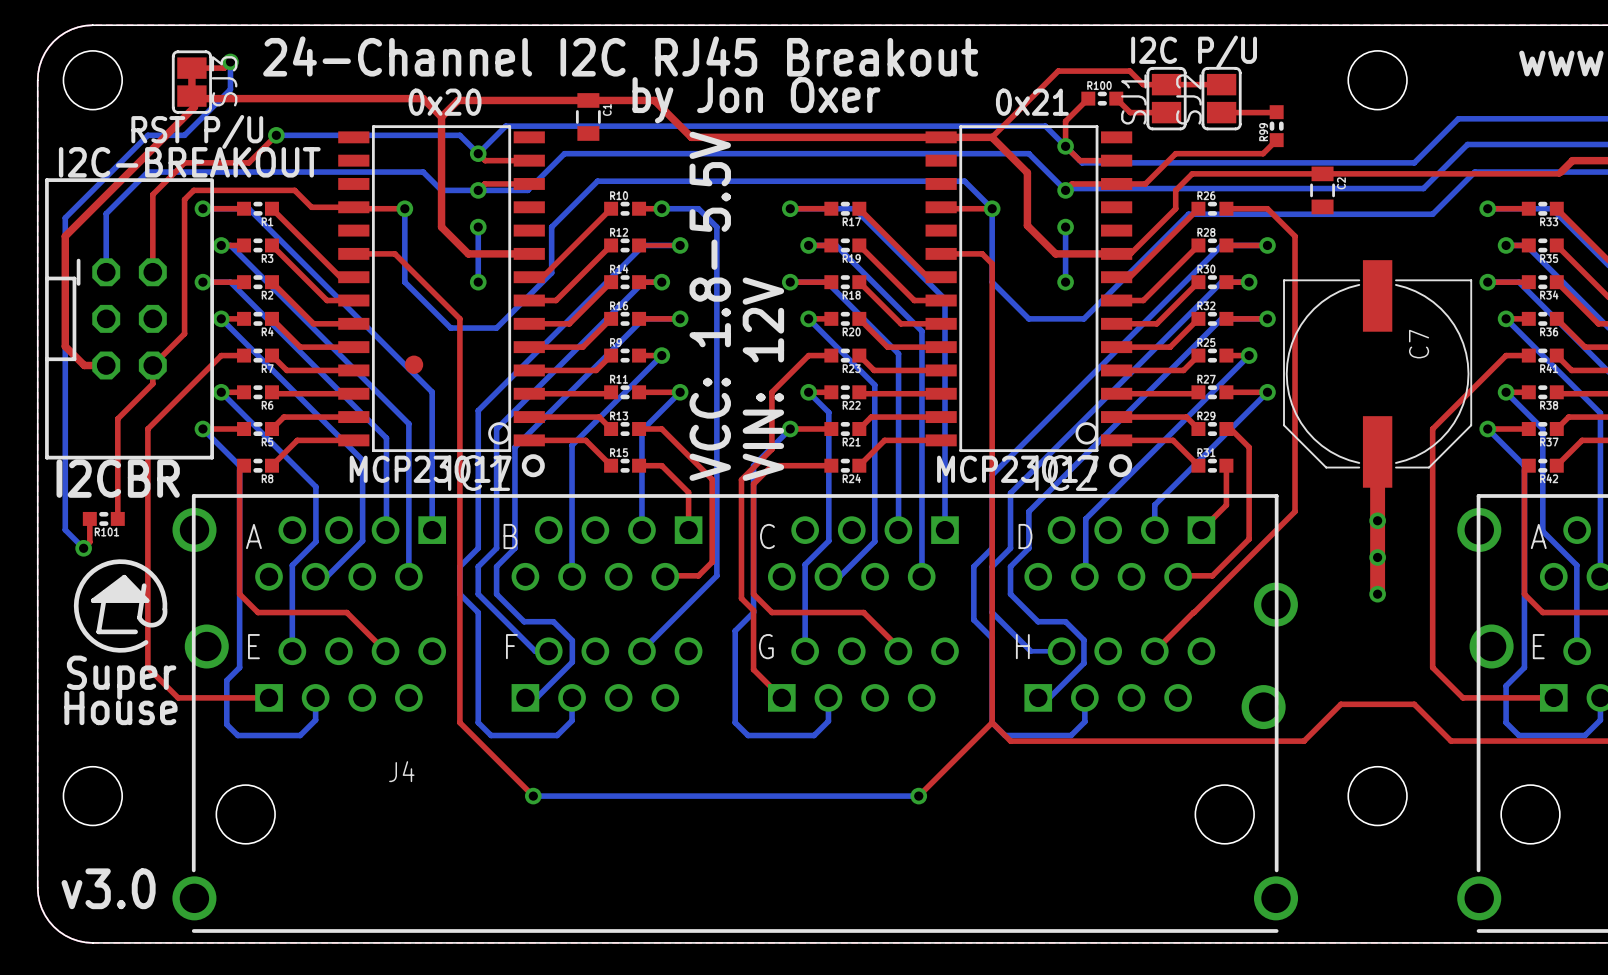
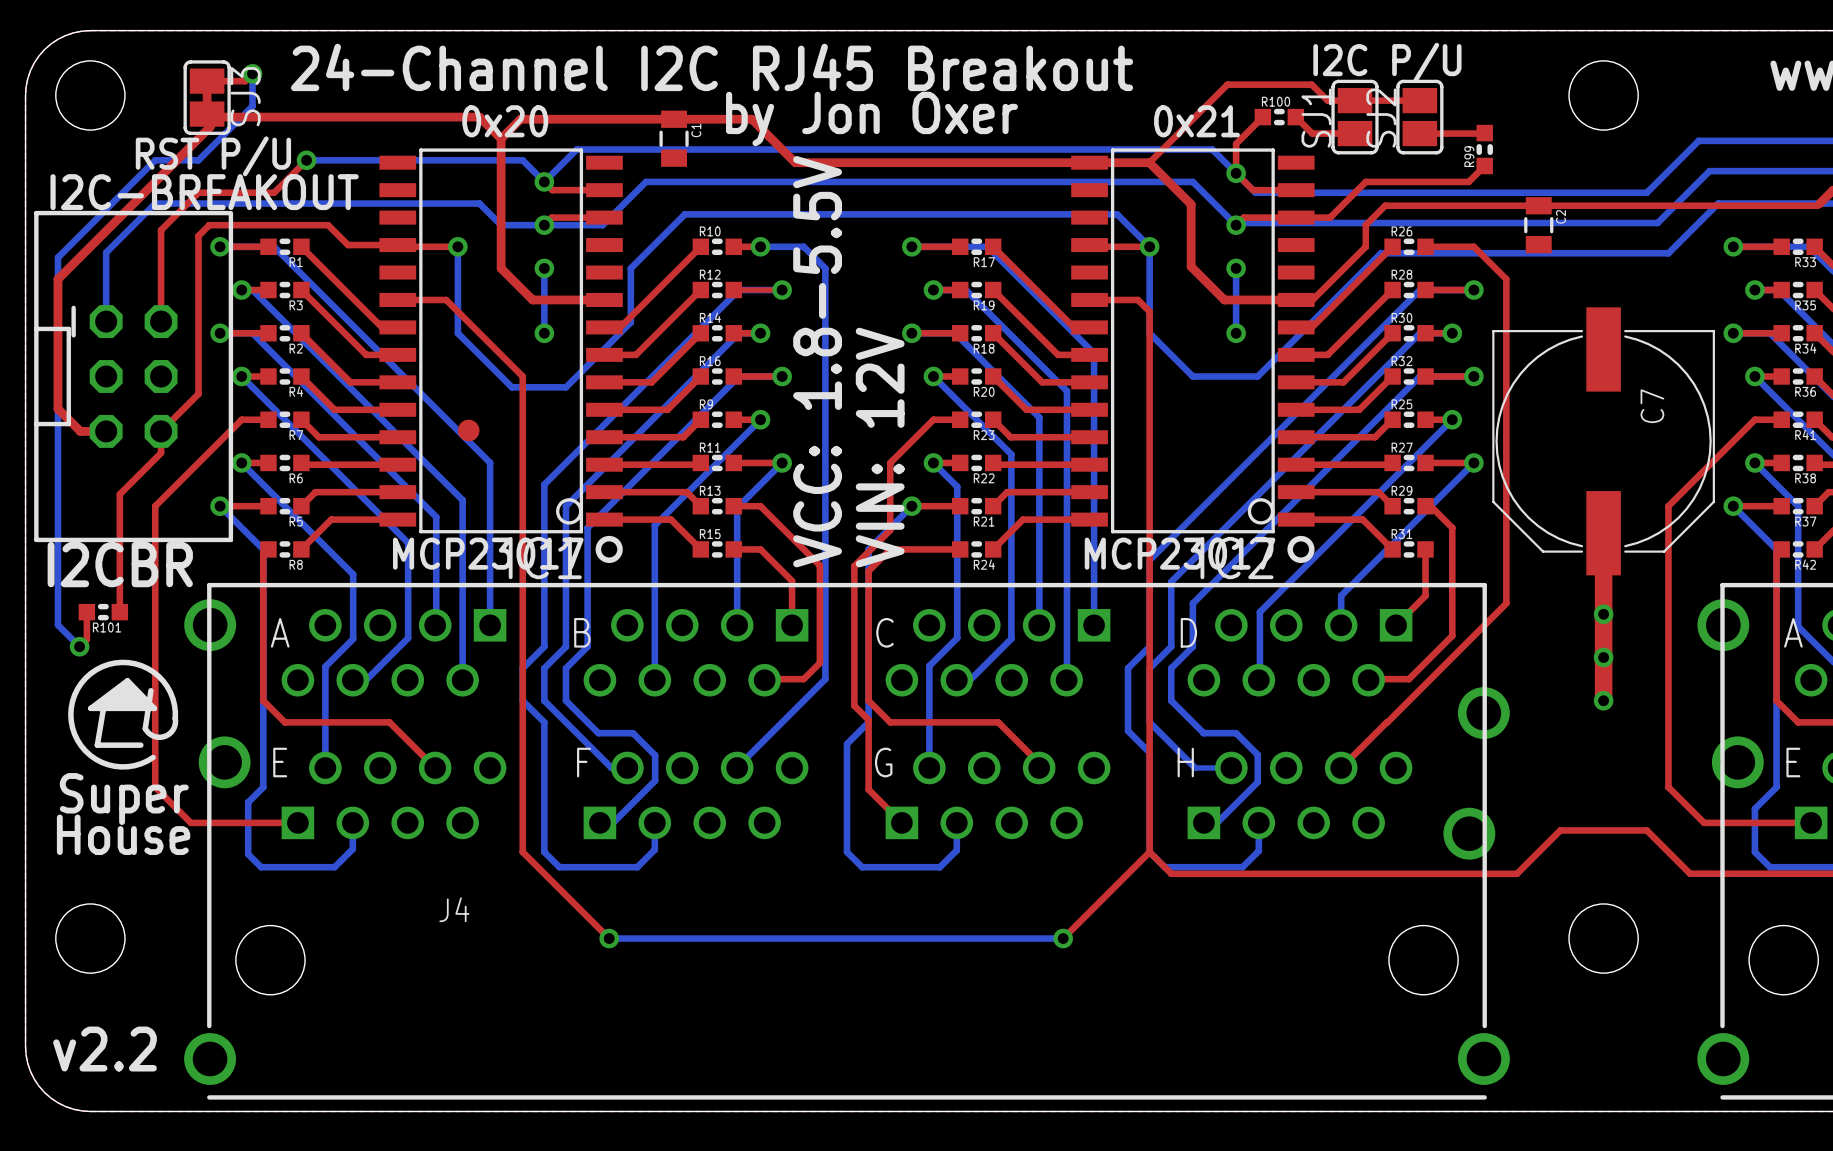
text: v3.0 (108, 888) -> v2.2 (104, 1049)

